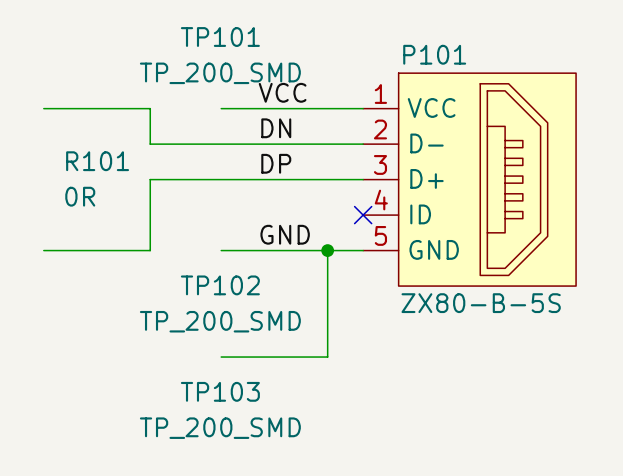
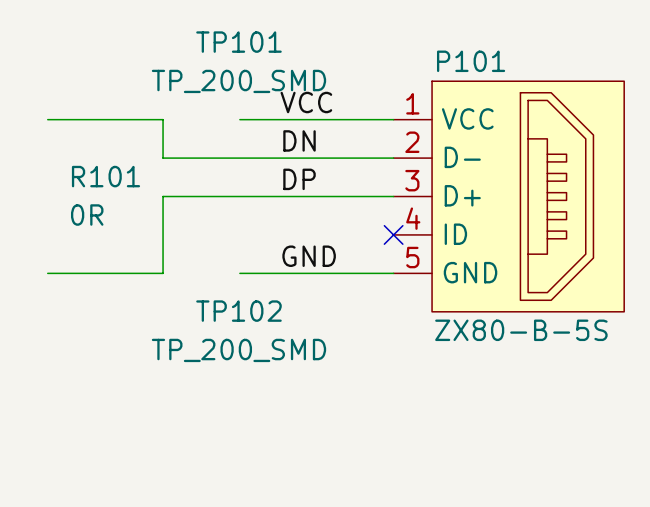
wire: (327, 250) (327, 357) (221, 357) -> none
junction: (327, 250) -> none
TP103: TP_200_SMD (220, 410) -> none

